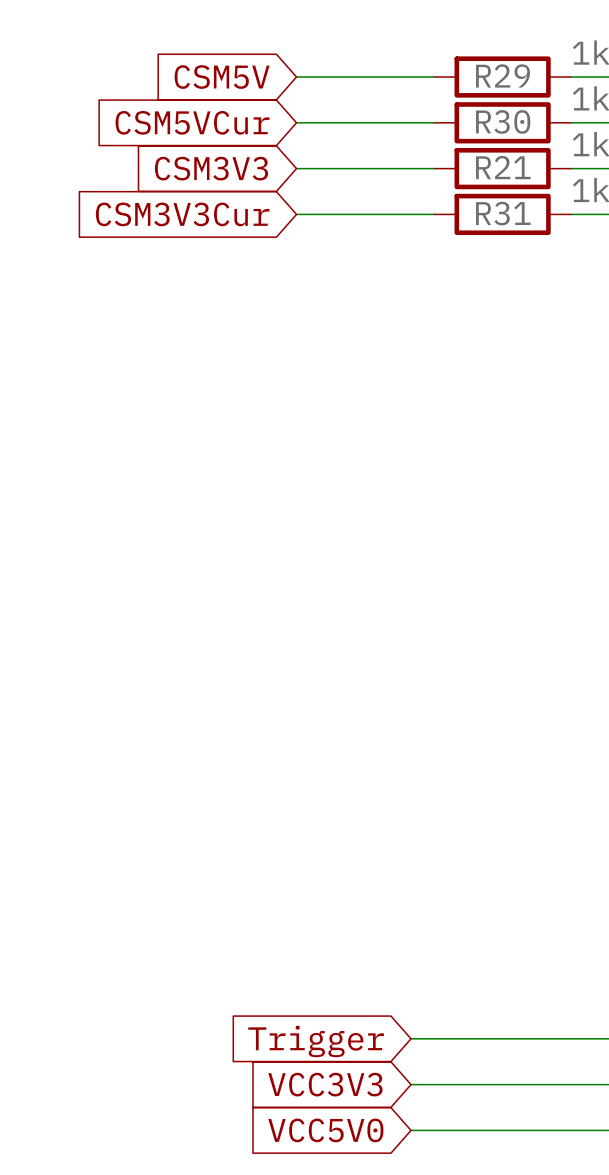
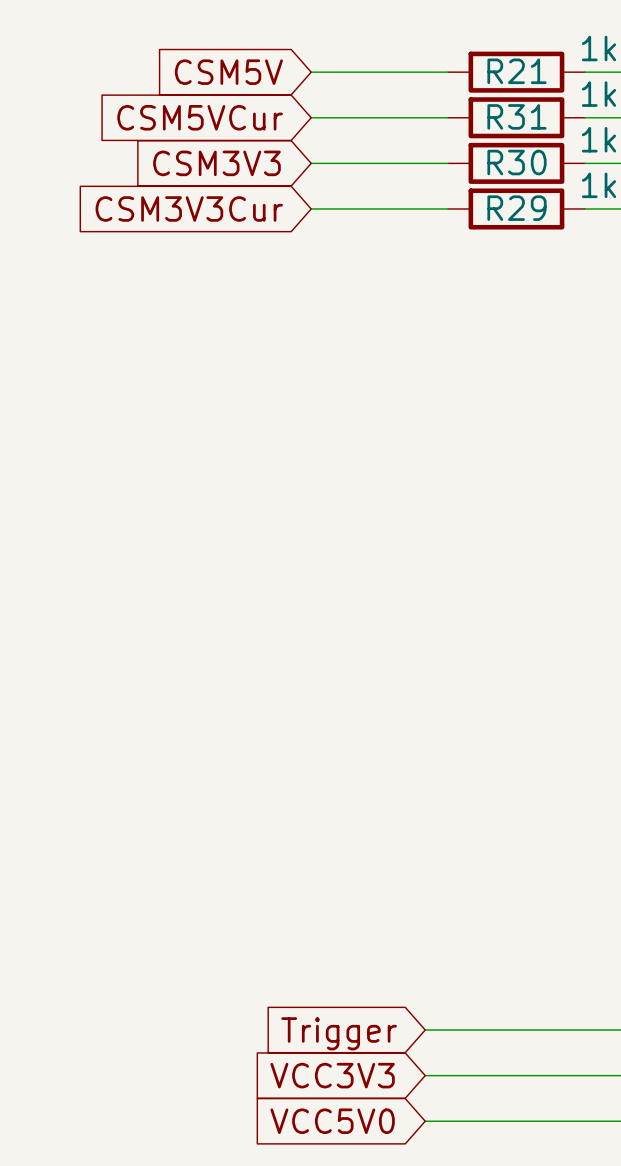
R29 name: R29 (503, 75) -> R21 (517, 71)
R30 name: R30 (503, 121) -> R31 (517, 116)
R21 name: R21 (503, 167) -> R30 (517, 162)
R31 name: R31 (503, 213) -> R29 (517, 208)

